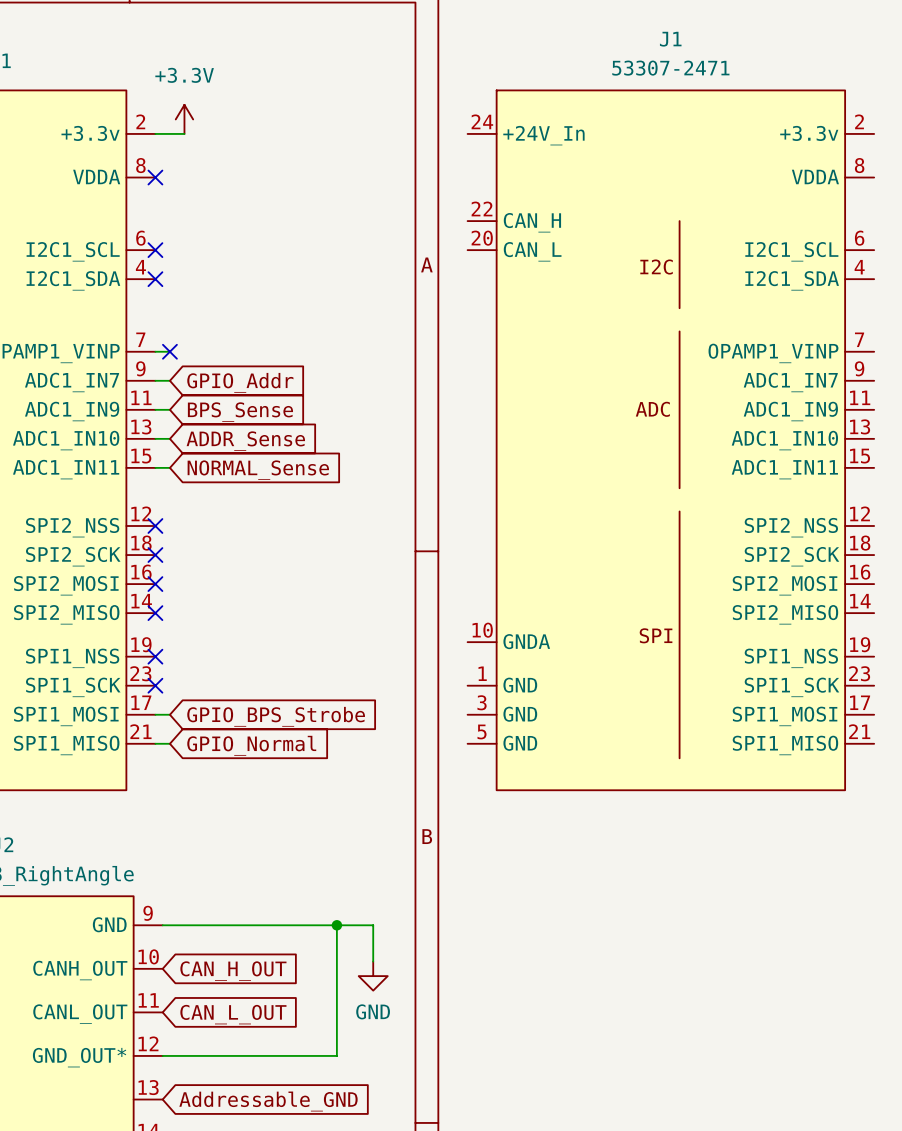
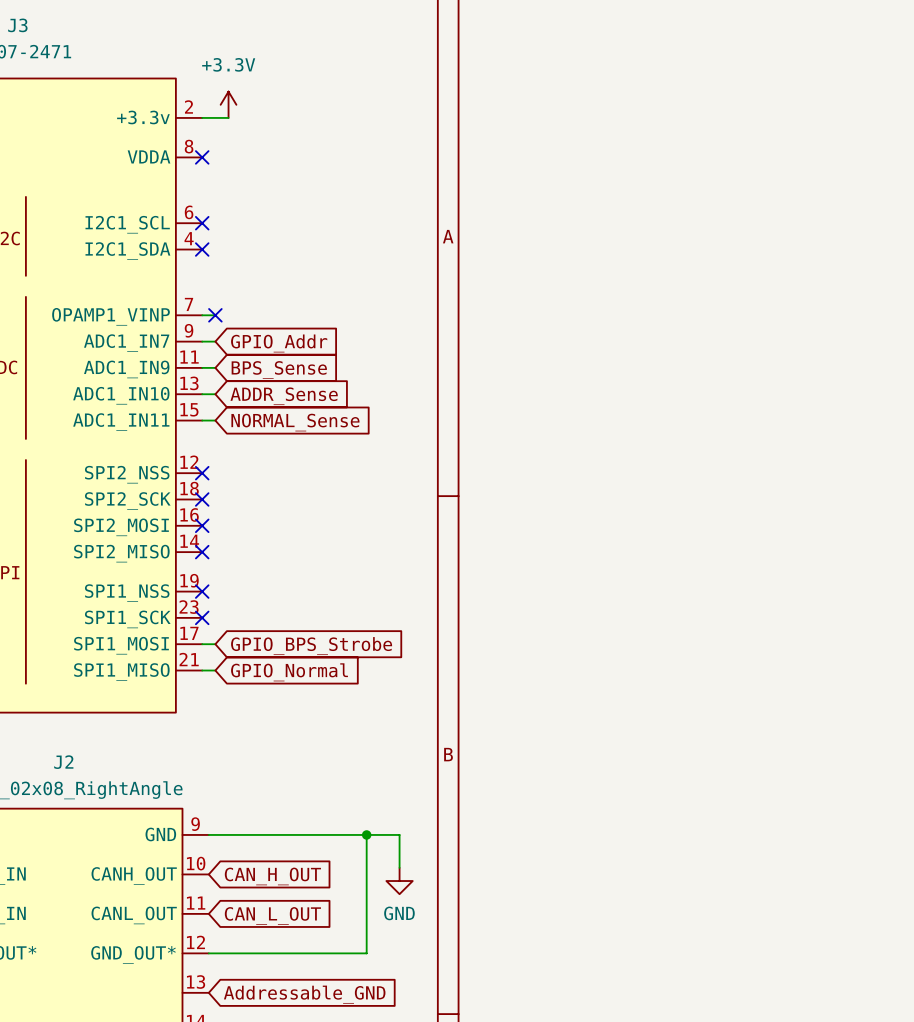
J1: 53307-2471 (670, 440) -> none

